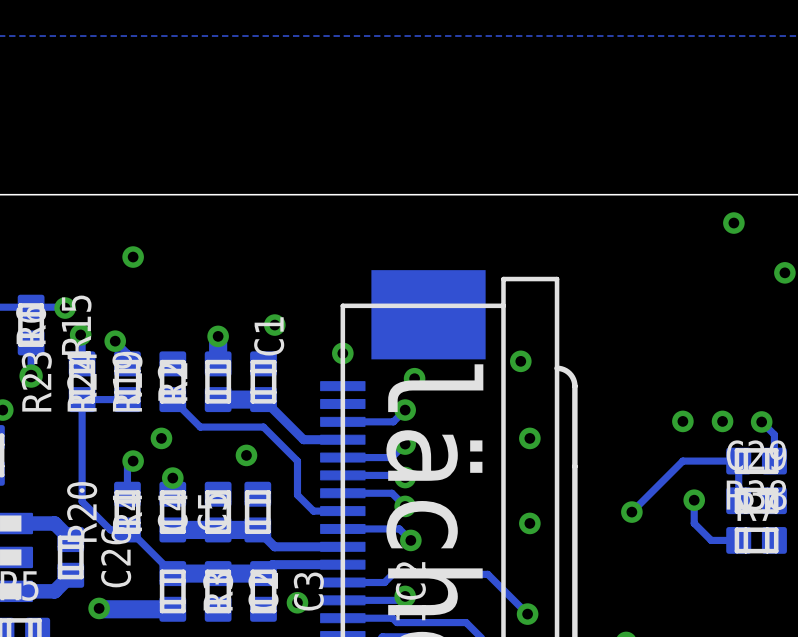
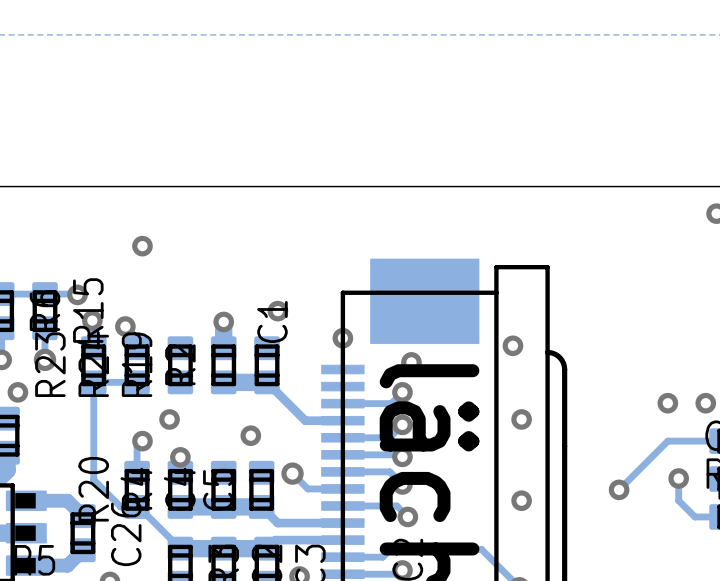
track: (172, 399) (200, 427) (263, 427) (297, 461) (297, 495) (313, 511) -> (292, 473) (307, 488) (314, 488)
via: none -> (292, 473)

